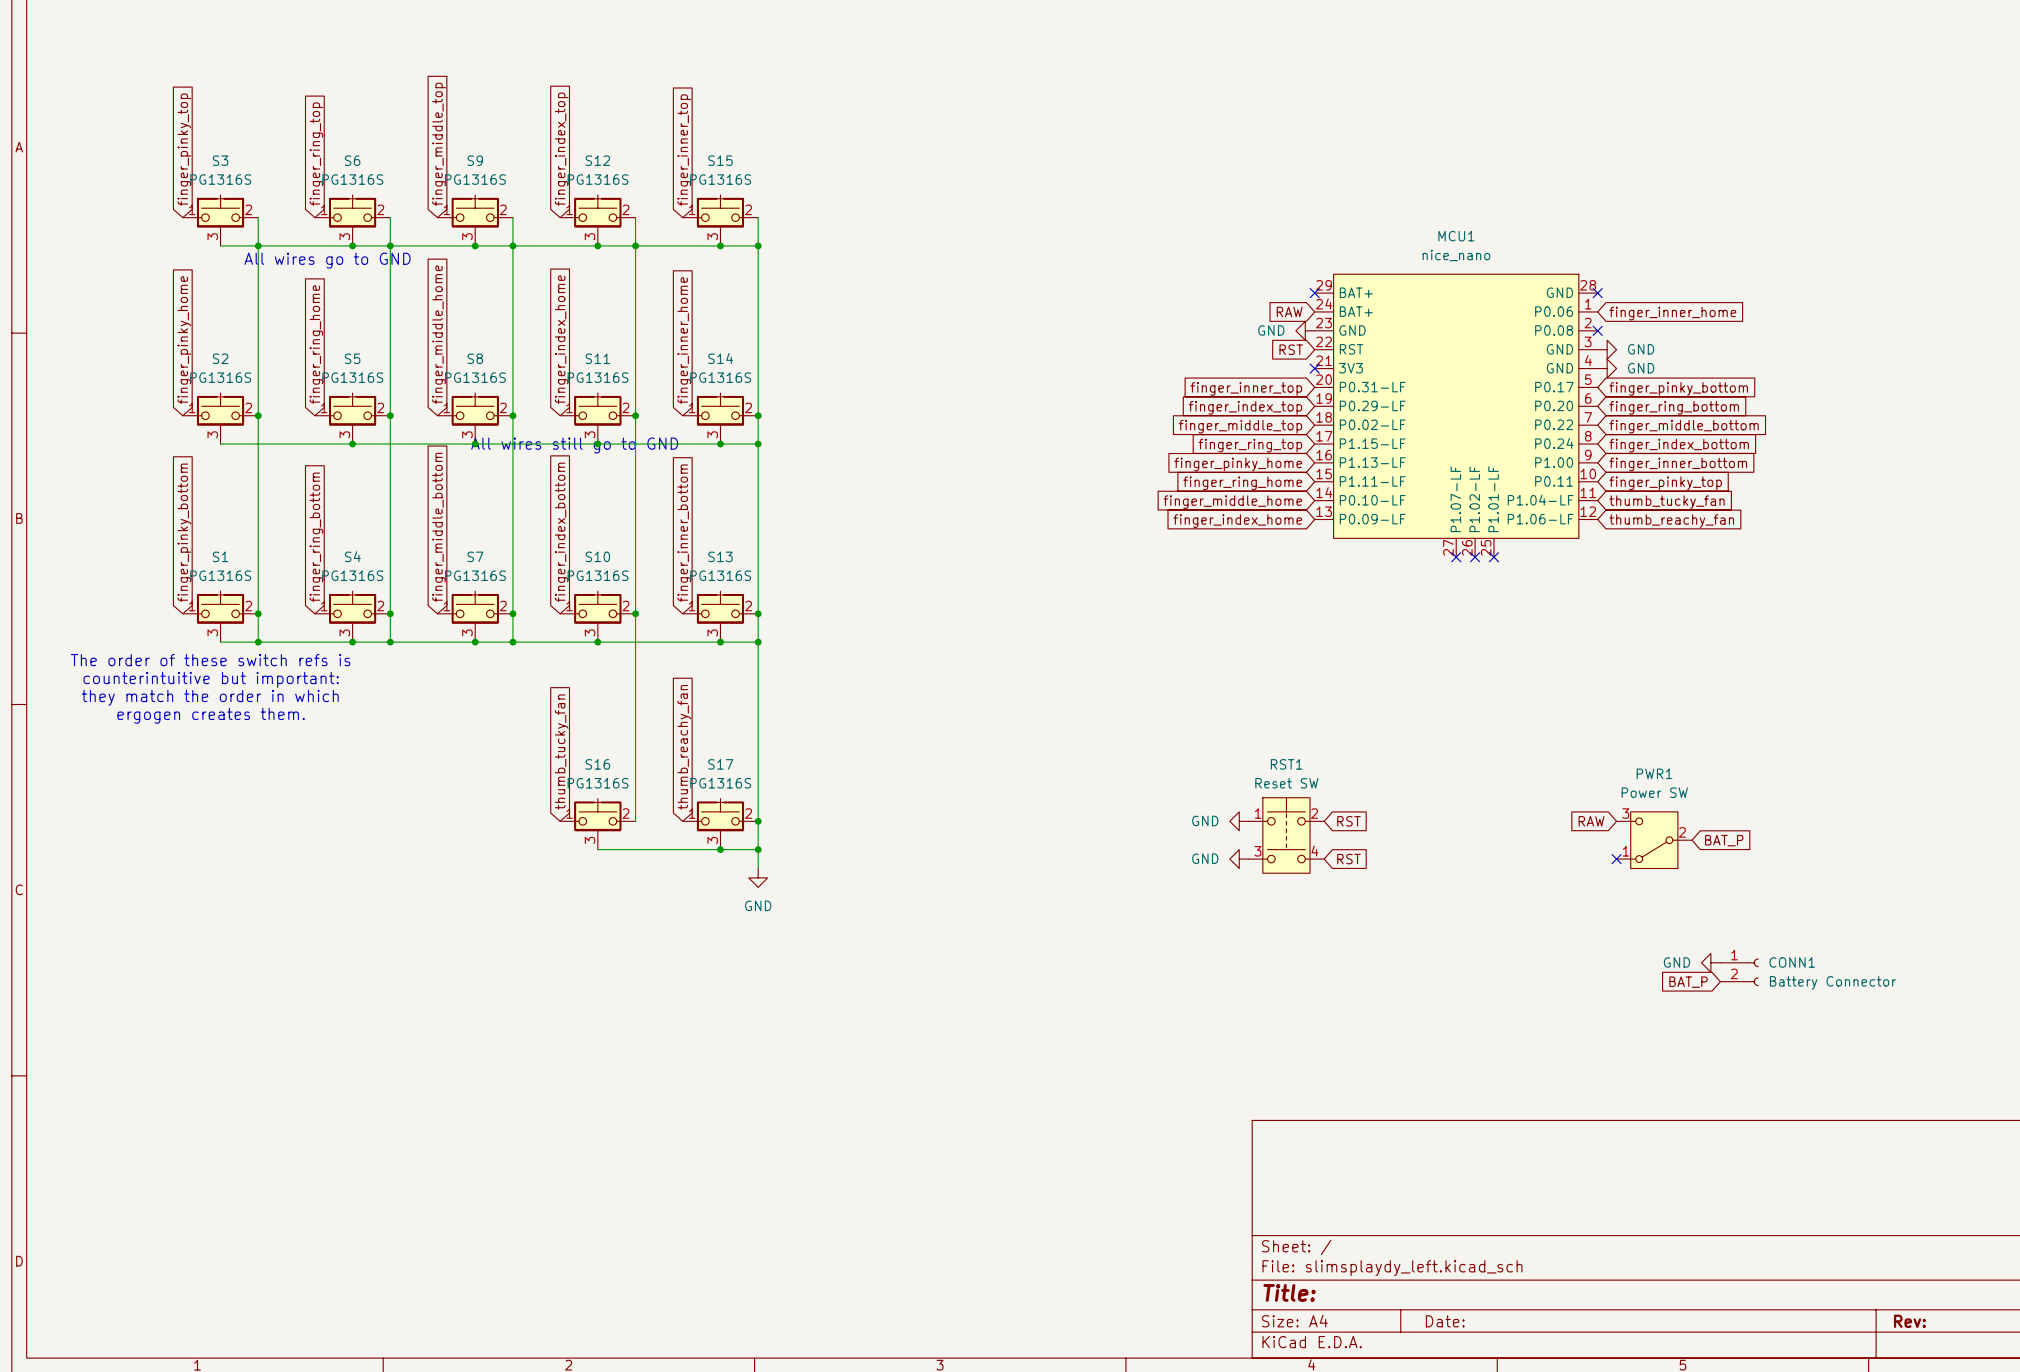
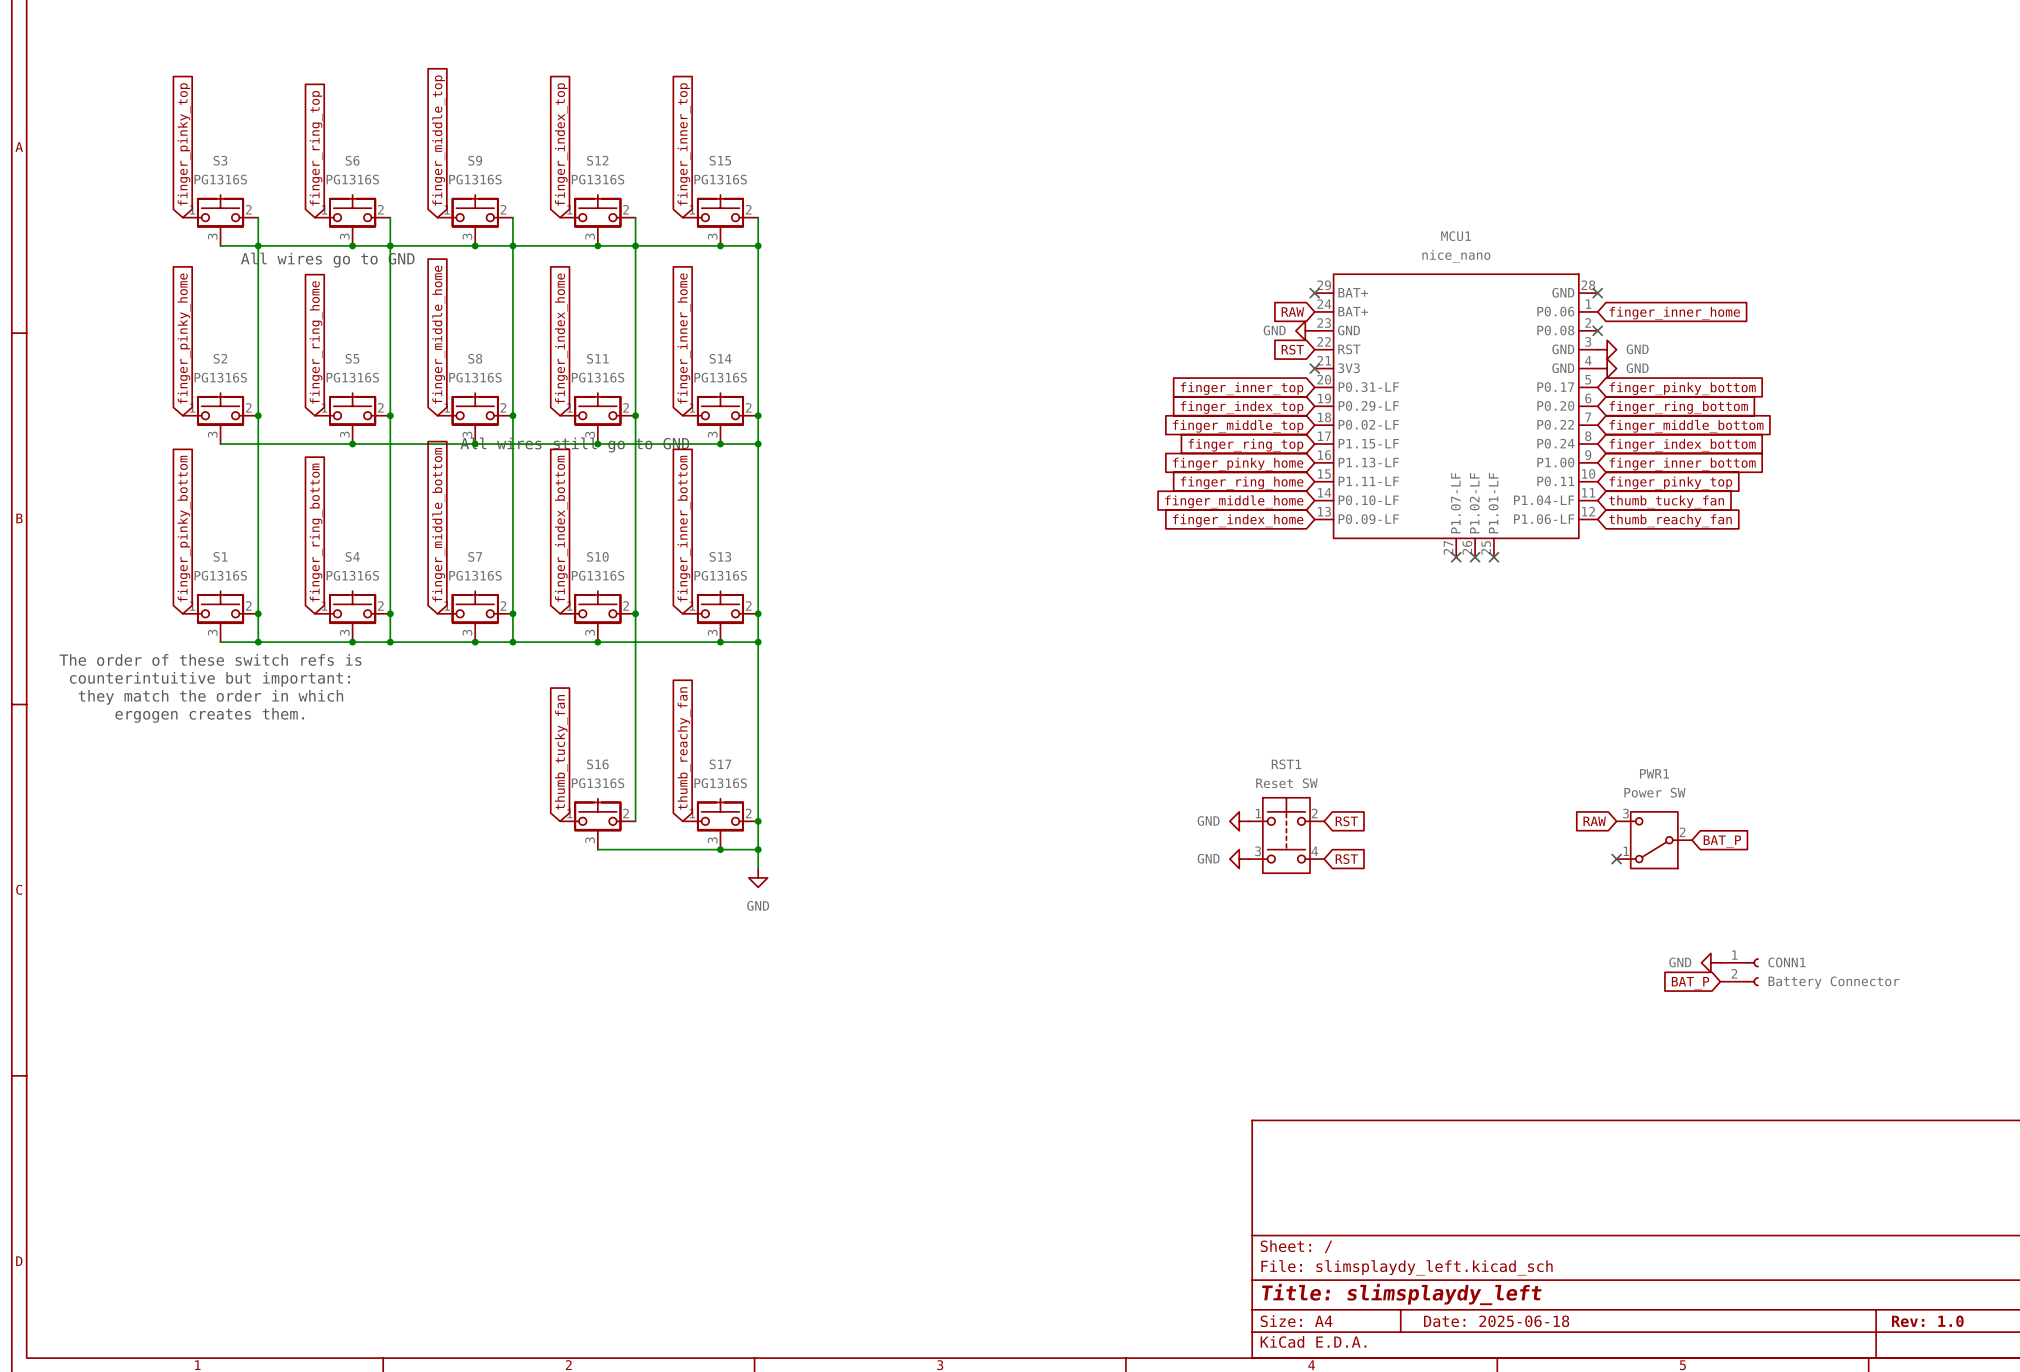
title block: Title: (1289, 1292) -> Title: slimsplaydy_left (1401, 1294)
title block: Date: (1445, 1321) -> Date: 2025-06-18 (1496, 1321)
title block: Rev: (1909, 1321) -> Rev: 1.0 (1927, 1321)

